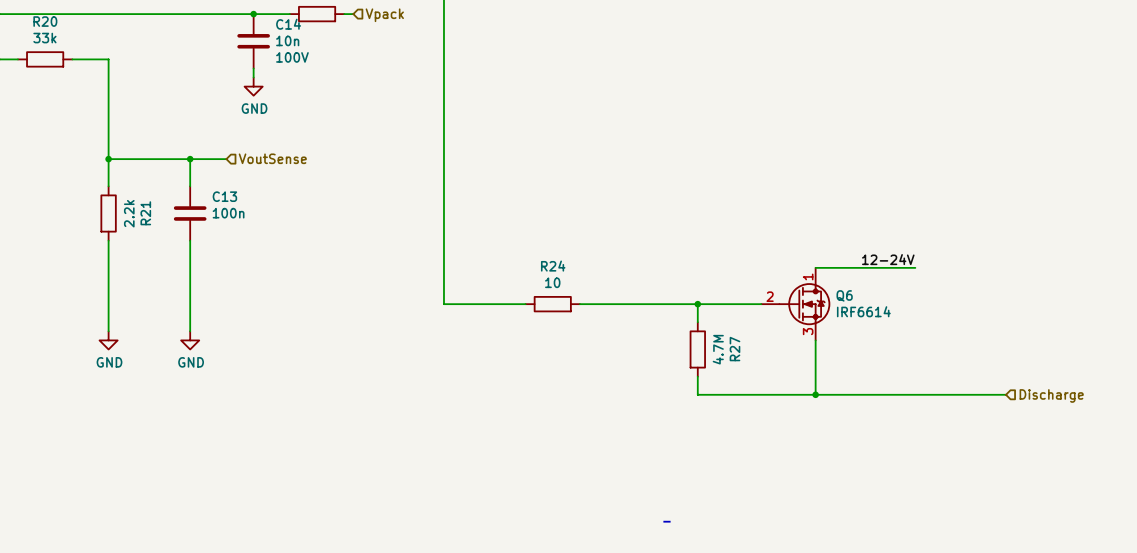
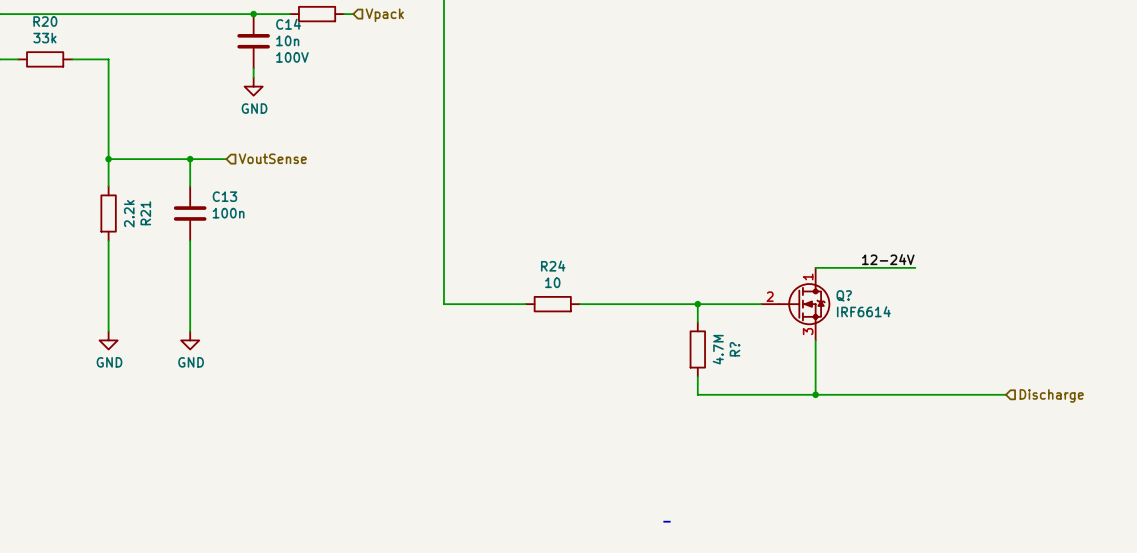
Q6 name: Q6 (844, 295) -> Q? (844, 295)
R27 name: R27 (734, 349) -> R? (734, 349)

